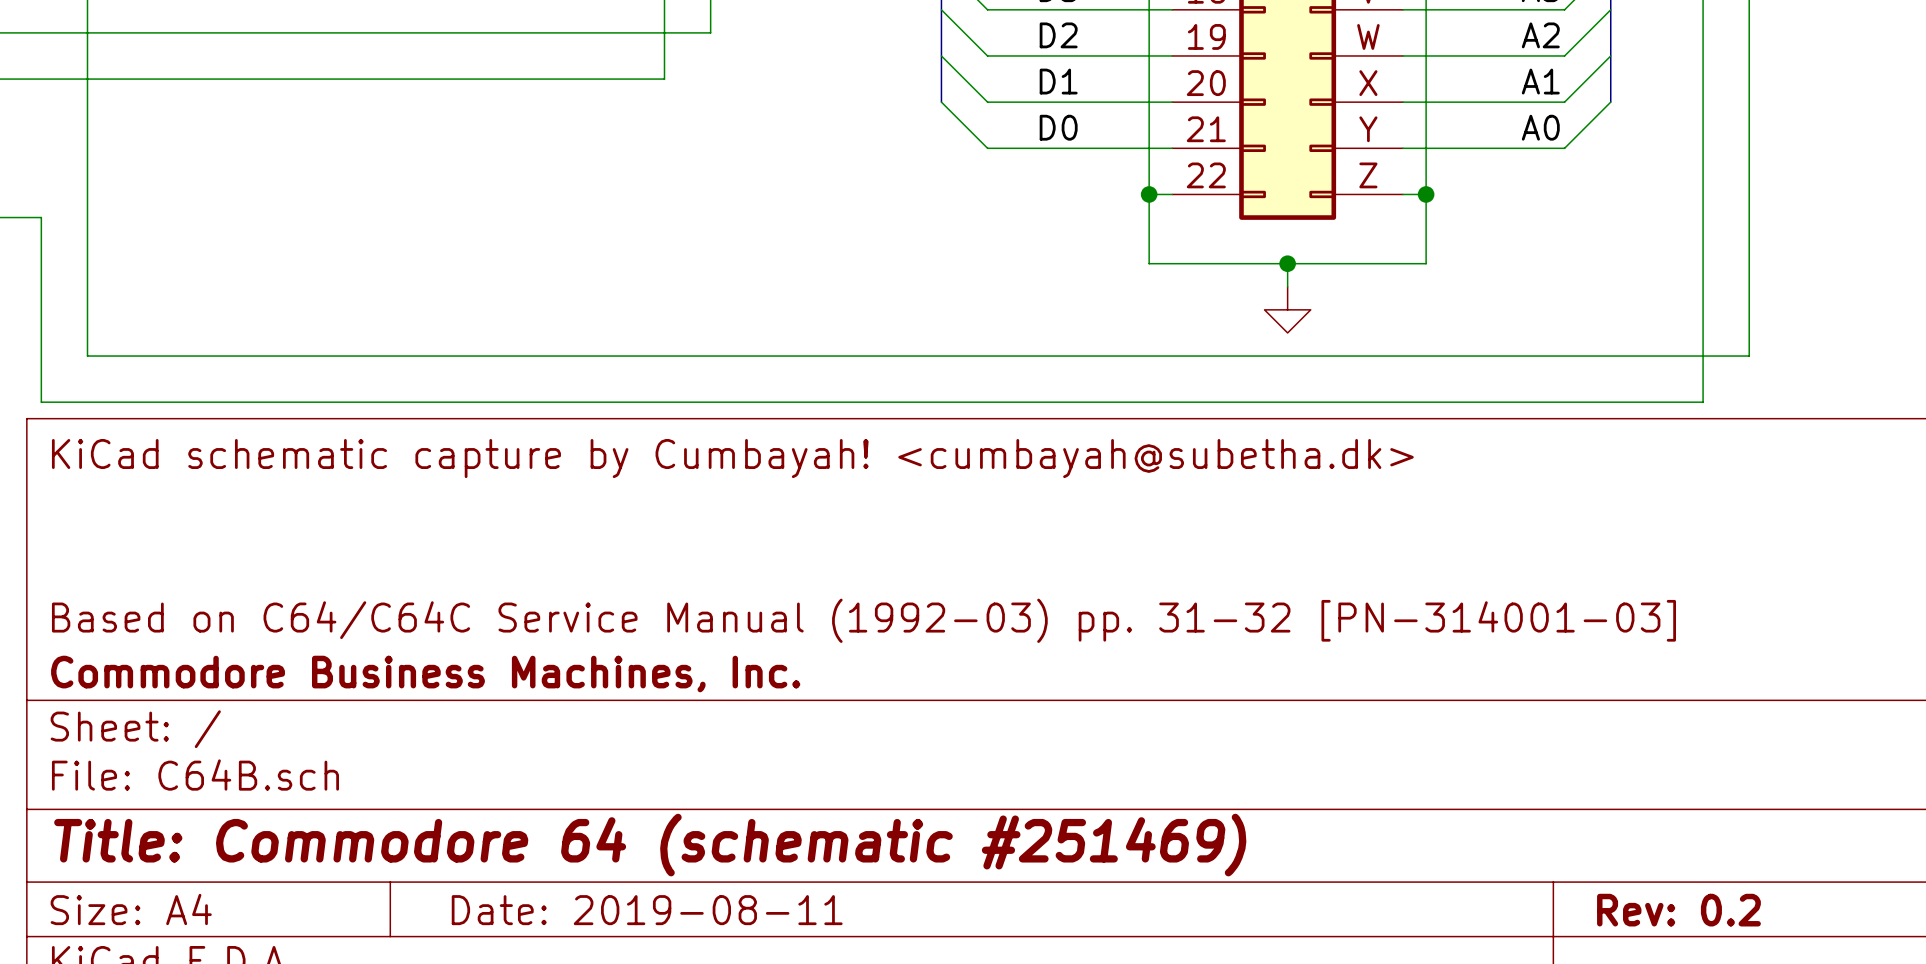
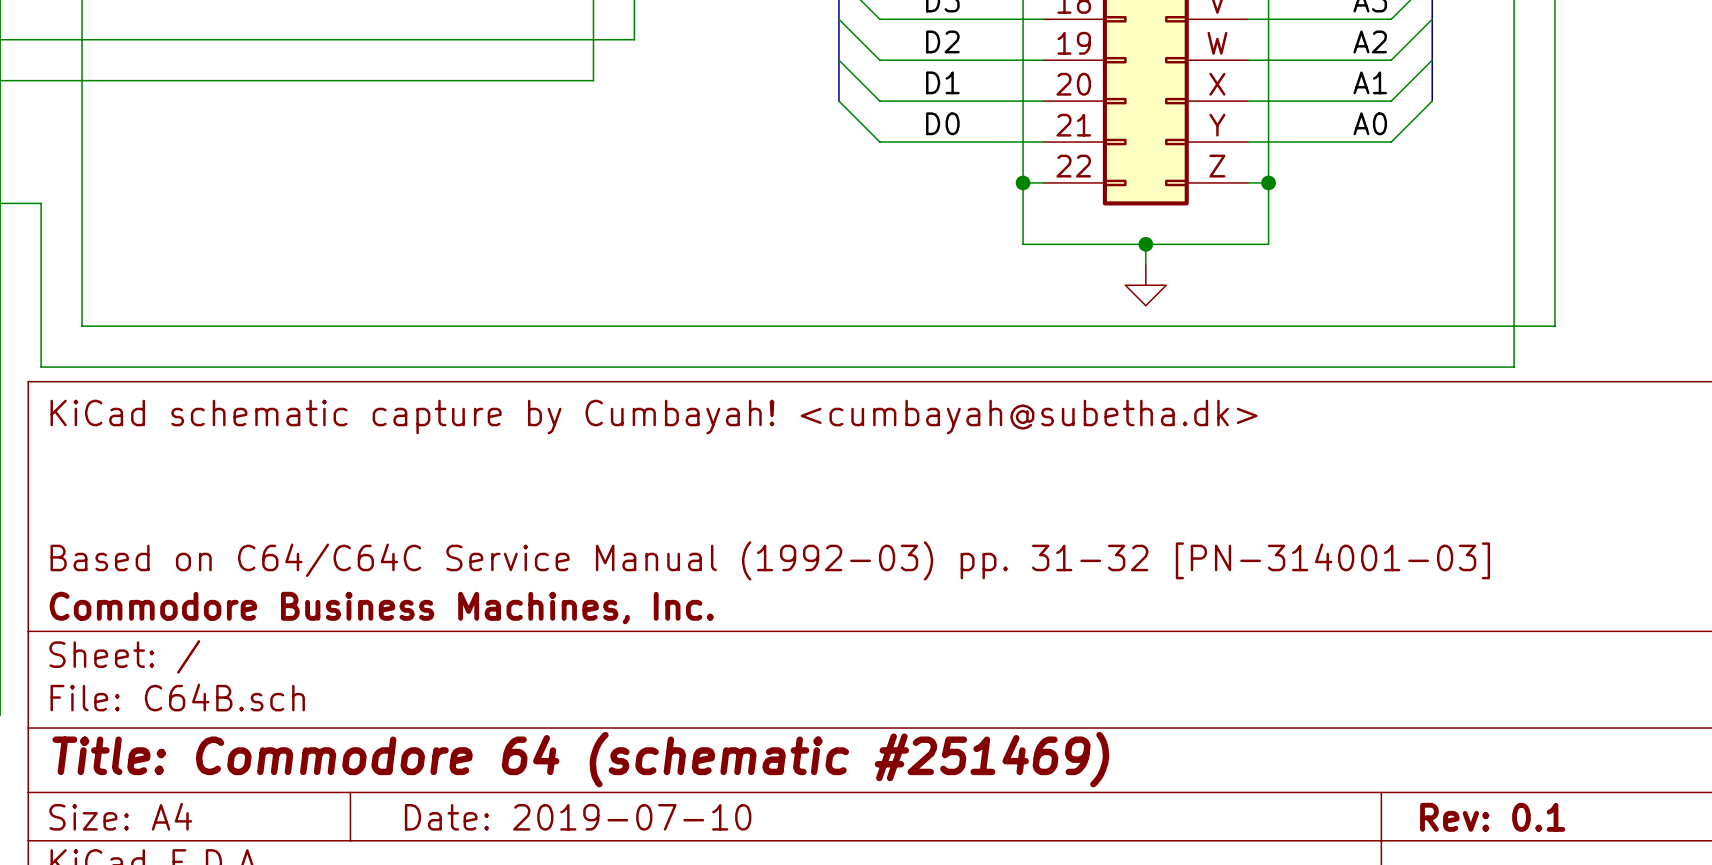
title block: Date: 2019-08-11 (647, 910) -> Date: 2019-07-10 (578, 817)
title block: Rev: 0.2 (1678, 910) -> Rev: 0.1 (1492, 817)

